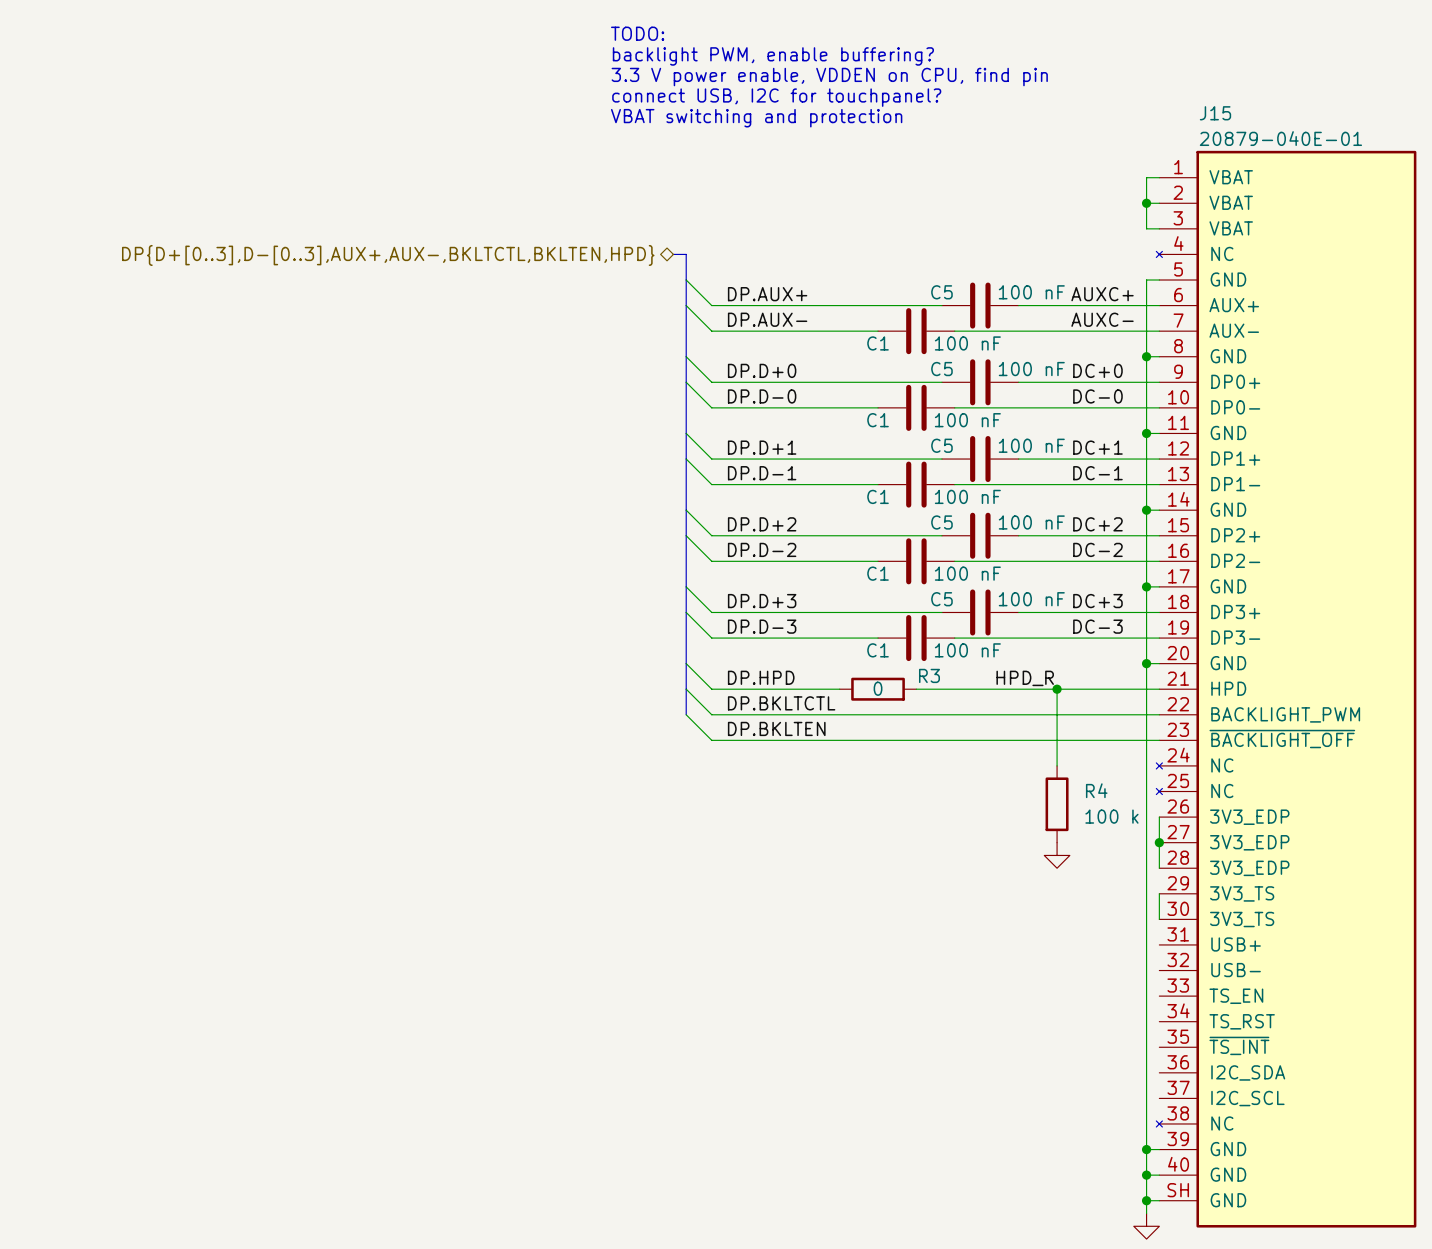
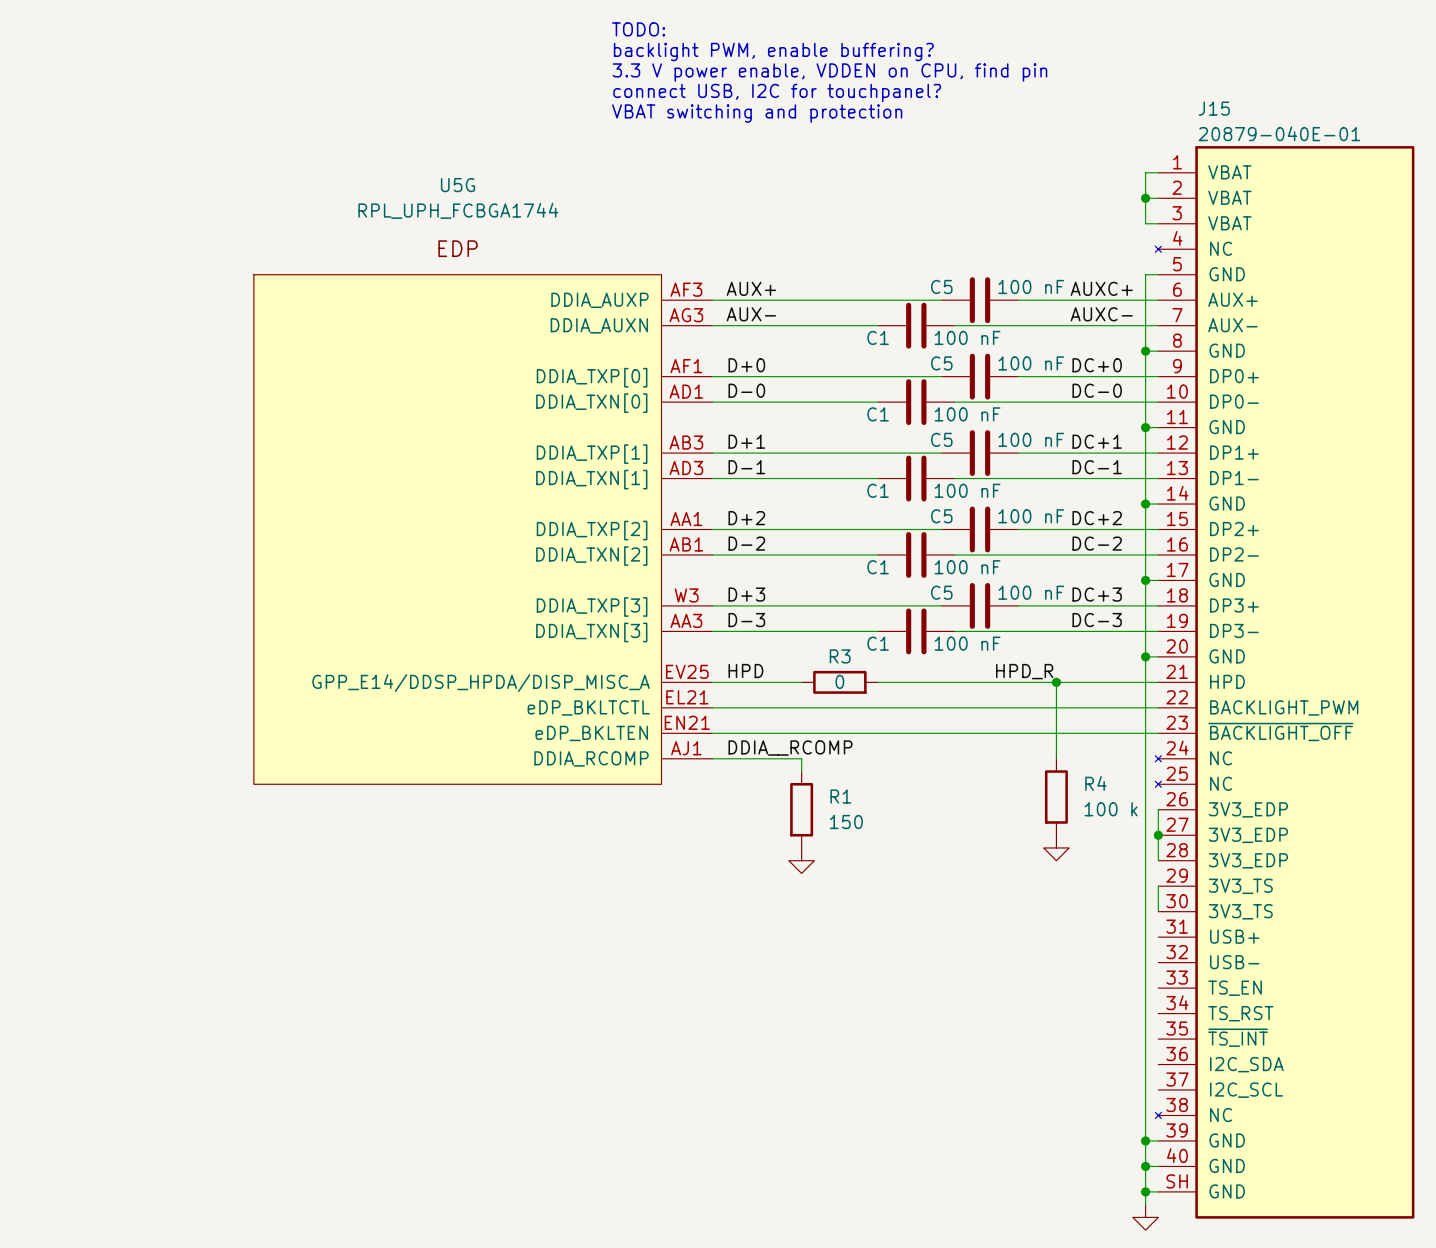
bus: (673, 254) (686, 254) (686, 714) -> none
hierarchical label: DP{D+[0..3],D-[0..3],AUX+,AUX-,BKLTCTL,BKLTEN,HPD} (388, 255) -> none
wire: (686, 280) (711, 305) -> none
label: DP.AUX+ (767, 294) -> AUX+ (751, 288)
wire: (686, 305) (711, 331) -> none
label: DP.AUX- (767, 319) -> AUX- (751, 314)
wire: (686, 356) (711, 382) -> none
label: DP.D+0 (762, 370) -> D+0 (746, 365)
wire: (686, 382) (711, 407) -> none
label: DP.D-0 (762, 396) -> D-0 (746, 390)
wire: (686, 433) (711, 459) -> none
label: DP.D+1 (762, 447) -> D+1 (746, 441)
wire: (686, 459) (711, 484) -> none
label: DP.D-1 (762, 473) -> D-1 (746, 467)
wire: (686, 510) (711, 535) -> none
label: DP.D+2 (762, 524) -> D+2 (746, 518)
U5G: none -> RPL_UPH_FCBGA1744 (483, 529)
wire: (686, 535) (711, 561) -> none
label: DP.D-2 (762, 549) -> D-2 (746, 543)
wire: (686, 586) (711, 612) -> none
label: DP.D+3 (762, 601) -> D+3 (746, 594)
wire: (686, 612) (711, 638) -> none
label: DP.D-3 (762, 626) -> D-3 (746, 620)
wire: (686, 663) (711, 689) -> none
R3 name position: R3 (929, 675) -> R3 (840, 656)
label: DP.HPD (761, 677) -> HPD (745, 671)
wire: (686, 689) (711, 714) -> none
wire: (801, 689) (839, 689) -> (878, 682) (916, 682)
R3 position: (878, 689) -> (839, 682)
label: DP.BKLTCTL (781, 703) -> none
wire: (686, 714) (711, 740) -> none
label: DP.BKLTEN (776, 728) -> none
label: none -> DDIA__RCOMP (790, 748)
wire: none -> (712, 758) (801, 758) (801, 771)
R1: none -> 150 (801, 809)
power symbol: none -> (801, 860)

